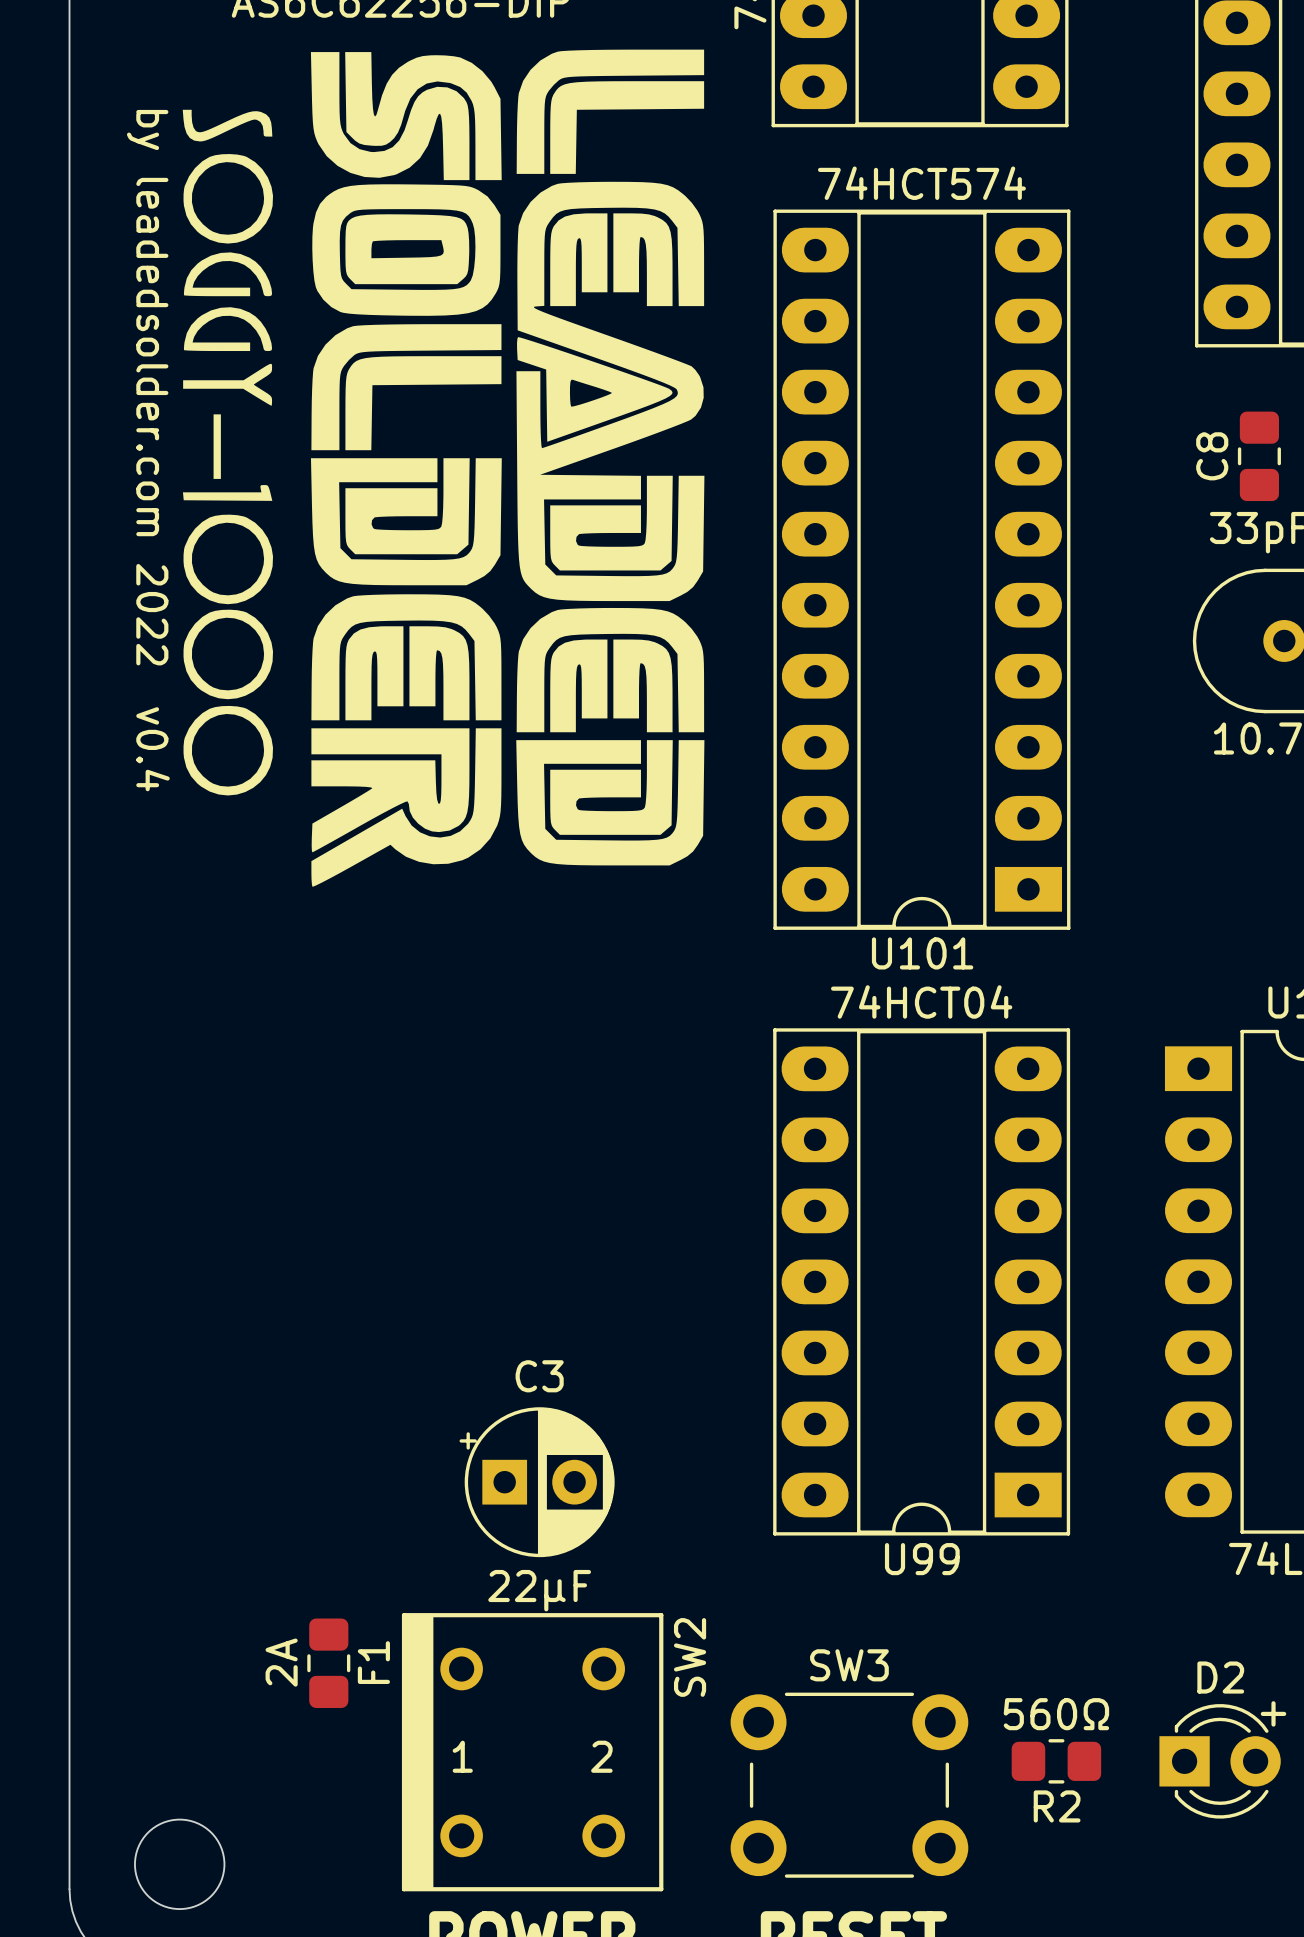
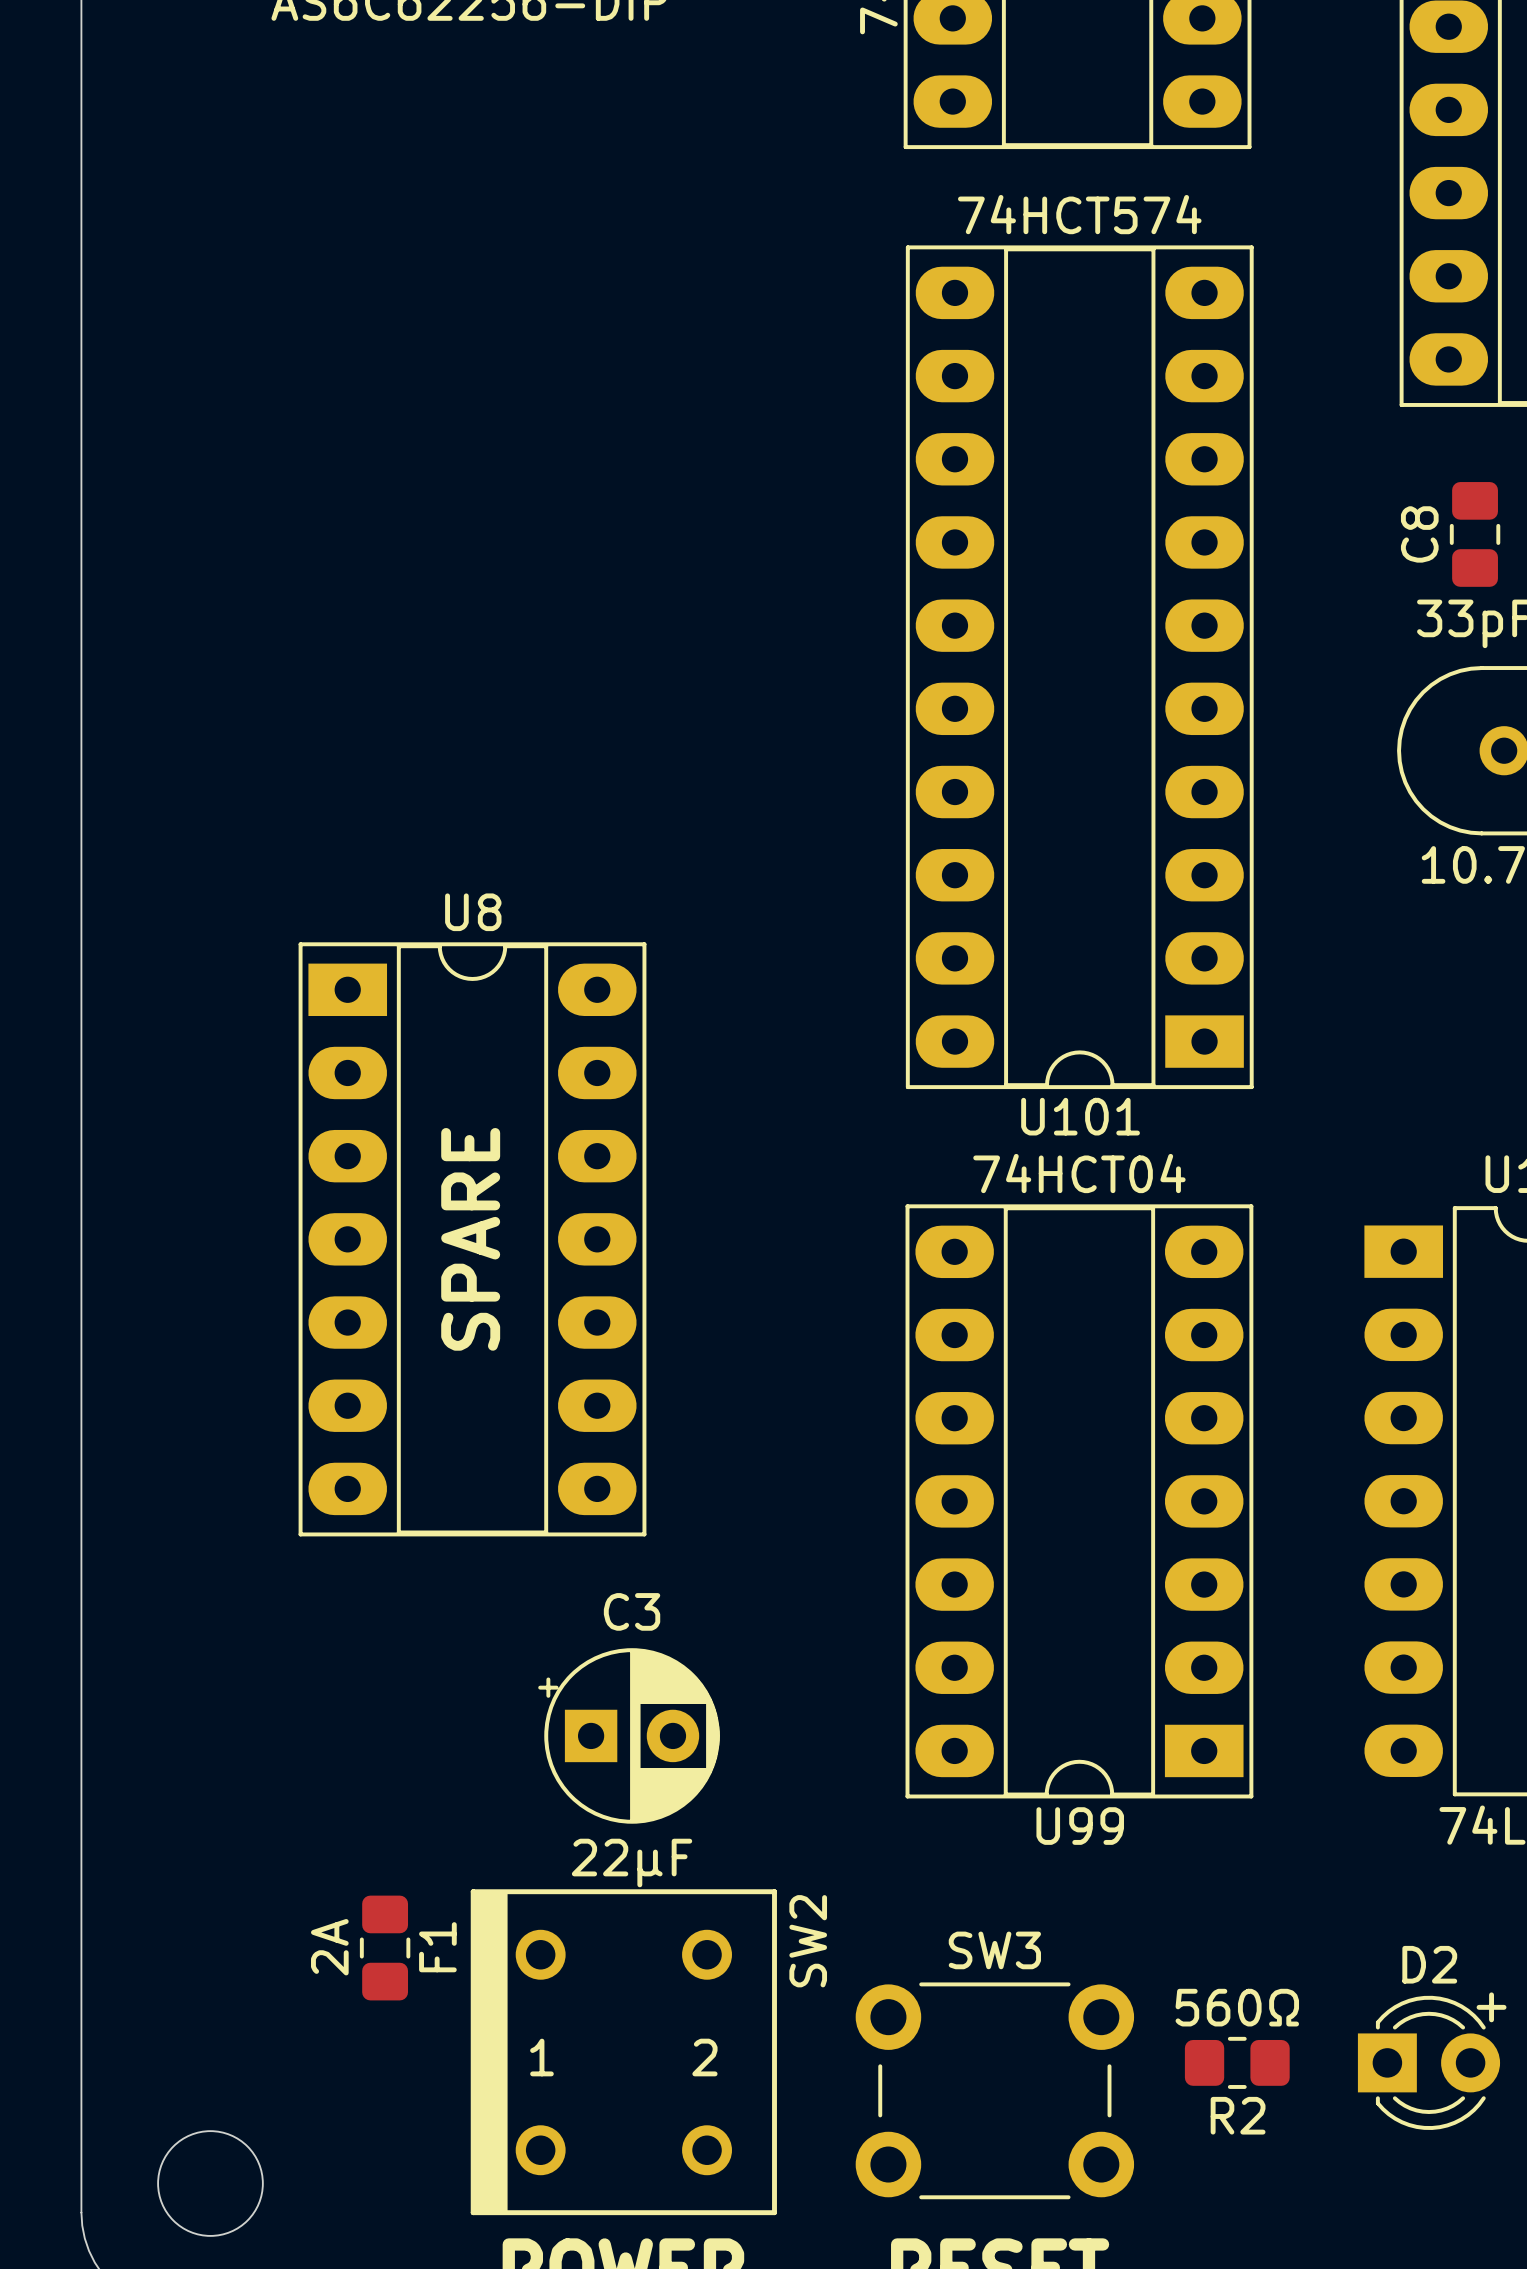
drawing: [310, 49, 705, 887] -> none
drawing: [182, 109, 274, 796] -> none
text: by leadedsolder.com 2022 (147, 387) -> none
text: v0.4 (153, 749) -> none
text: none -> SPARE (470, 1239)
U8: none -> (472, 1239)

